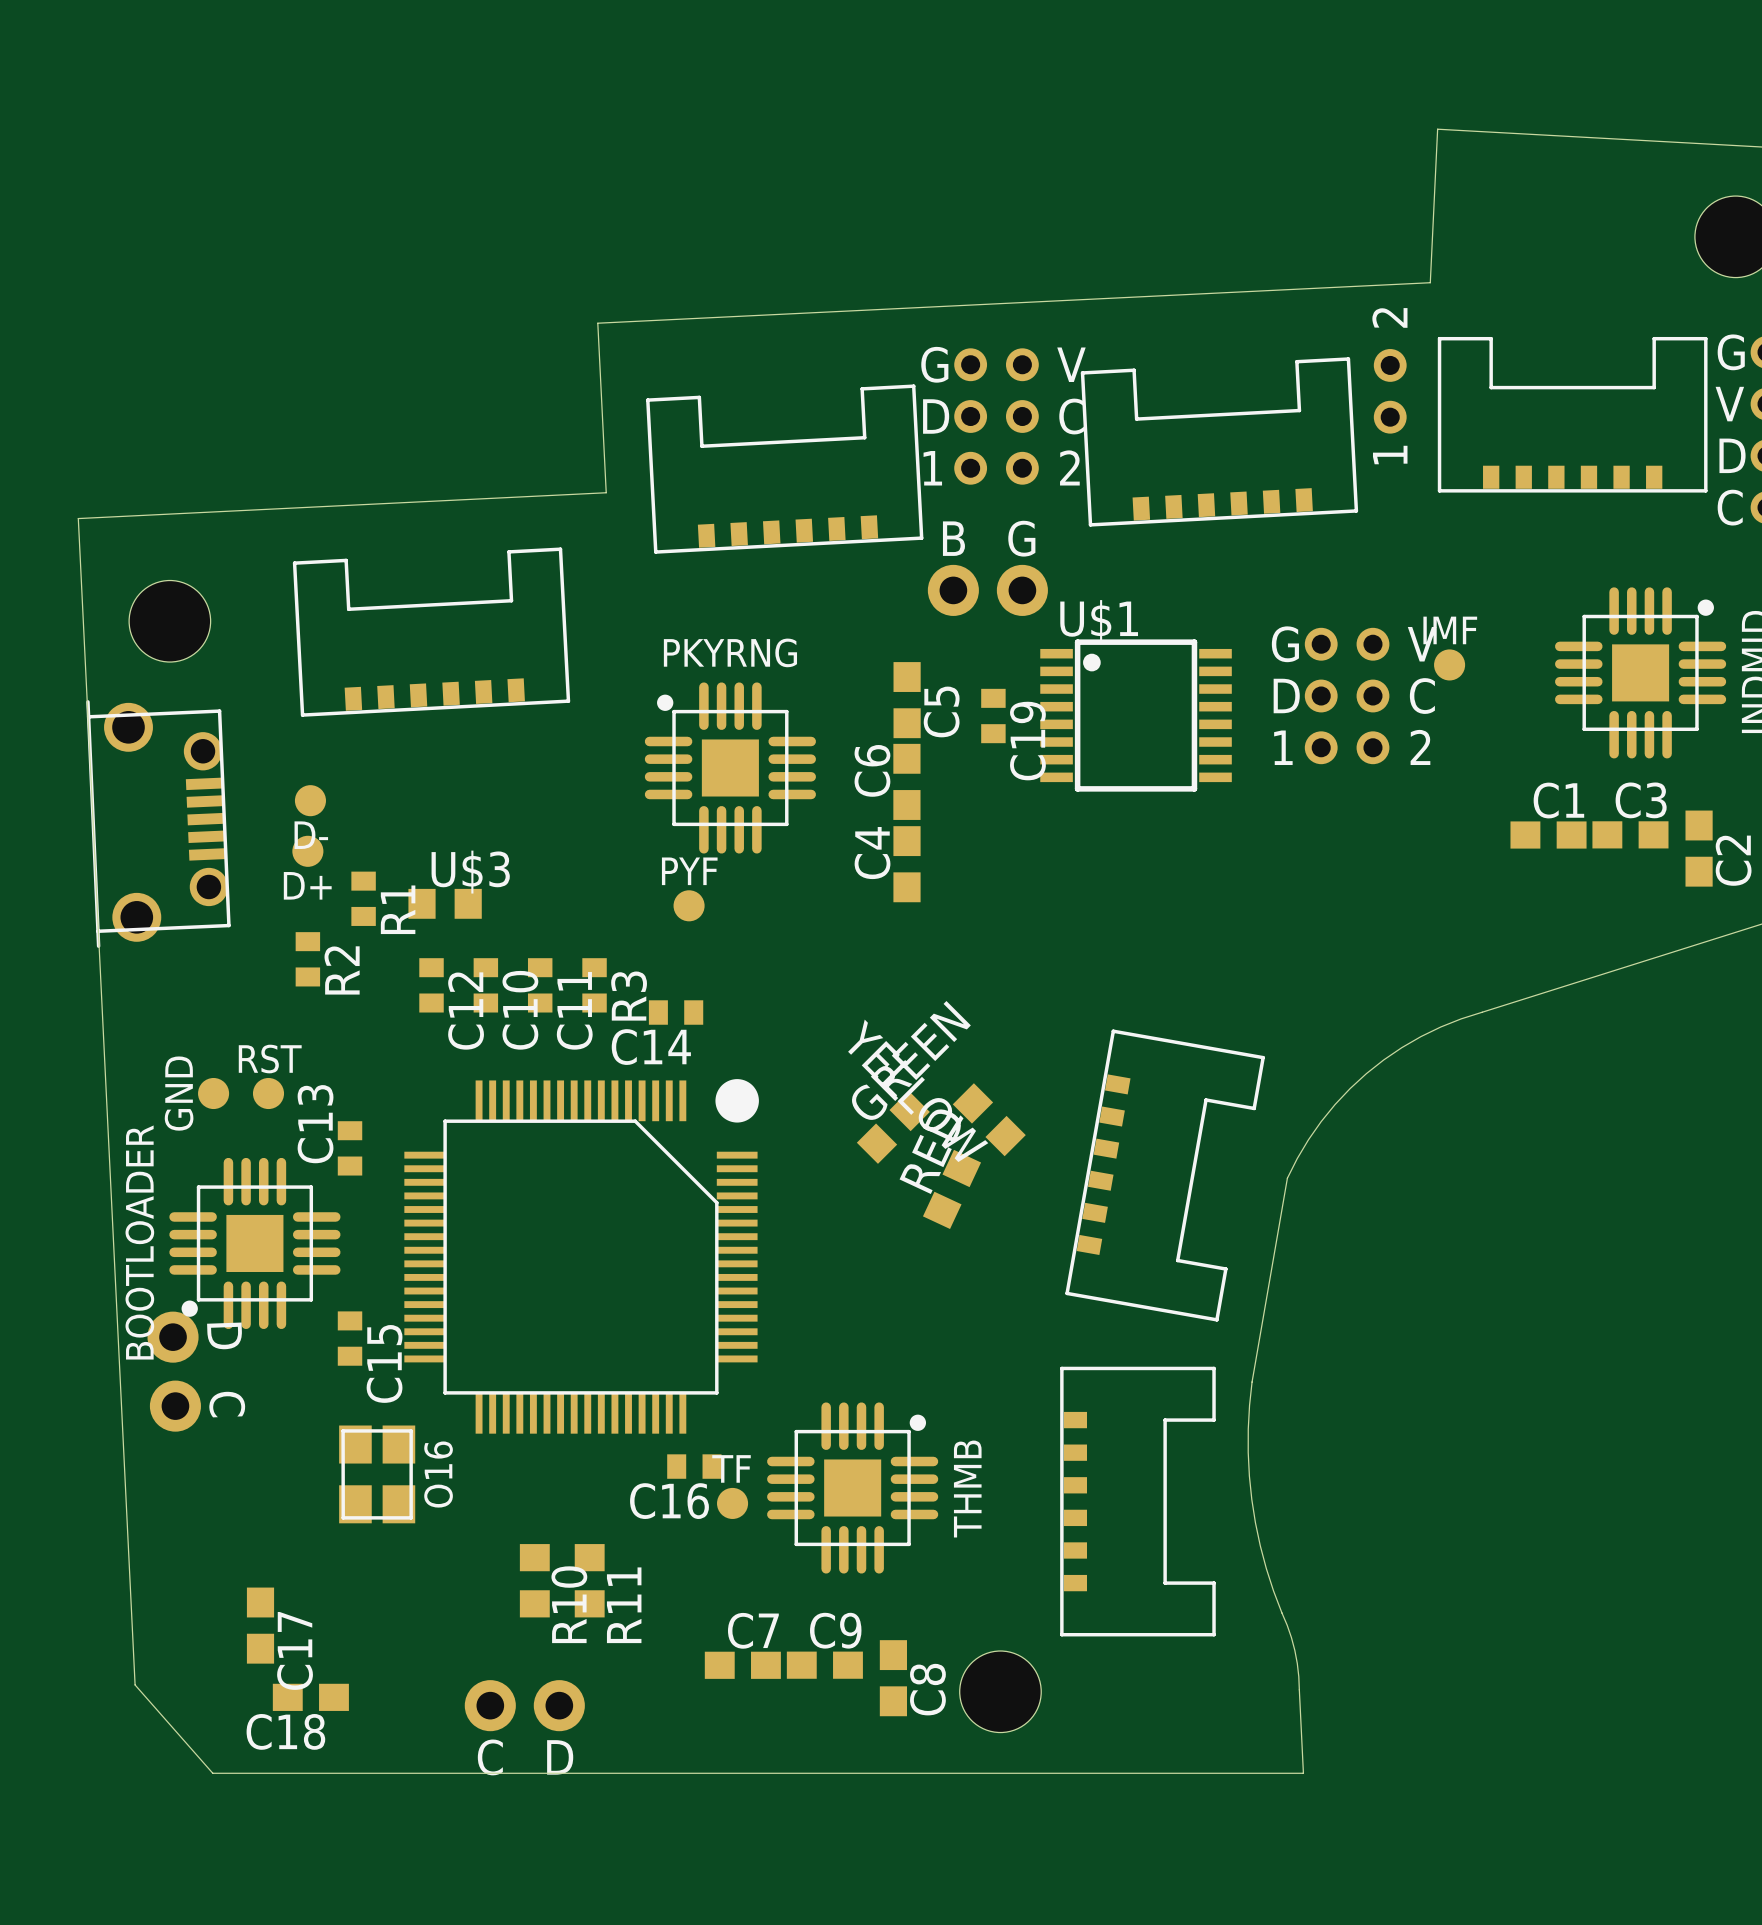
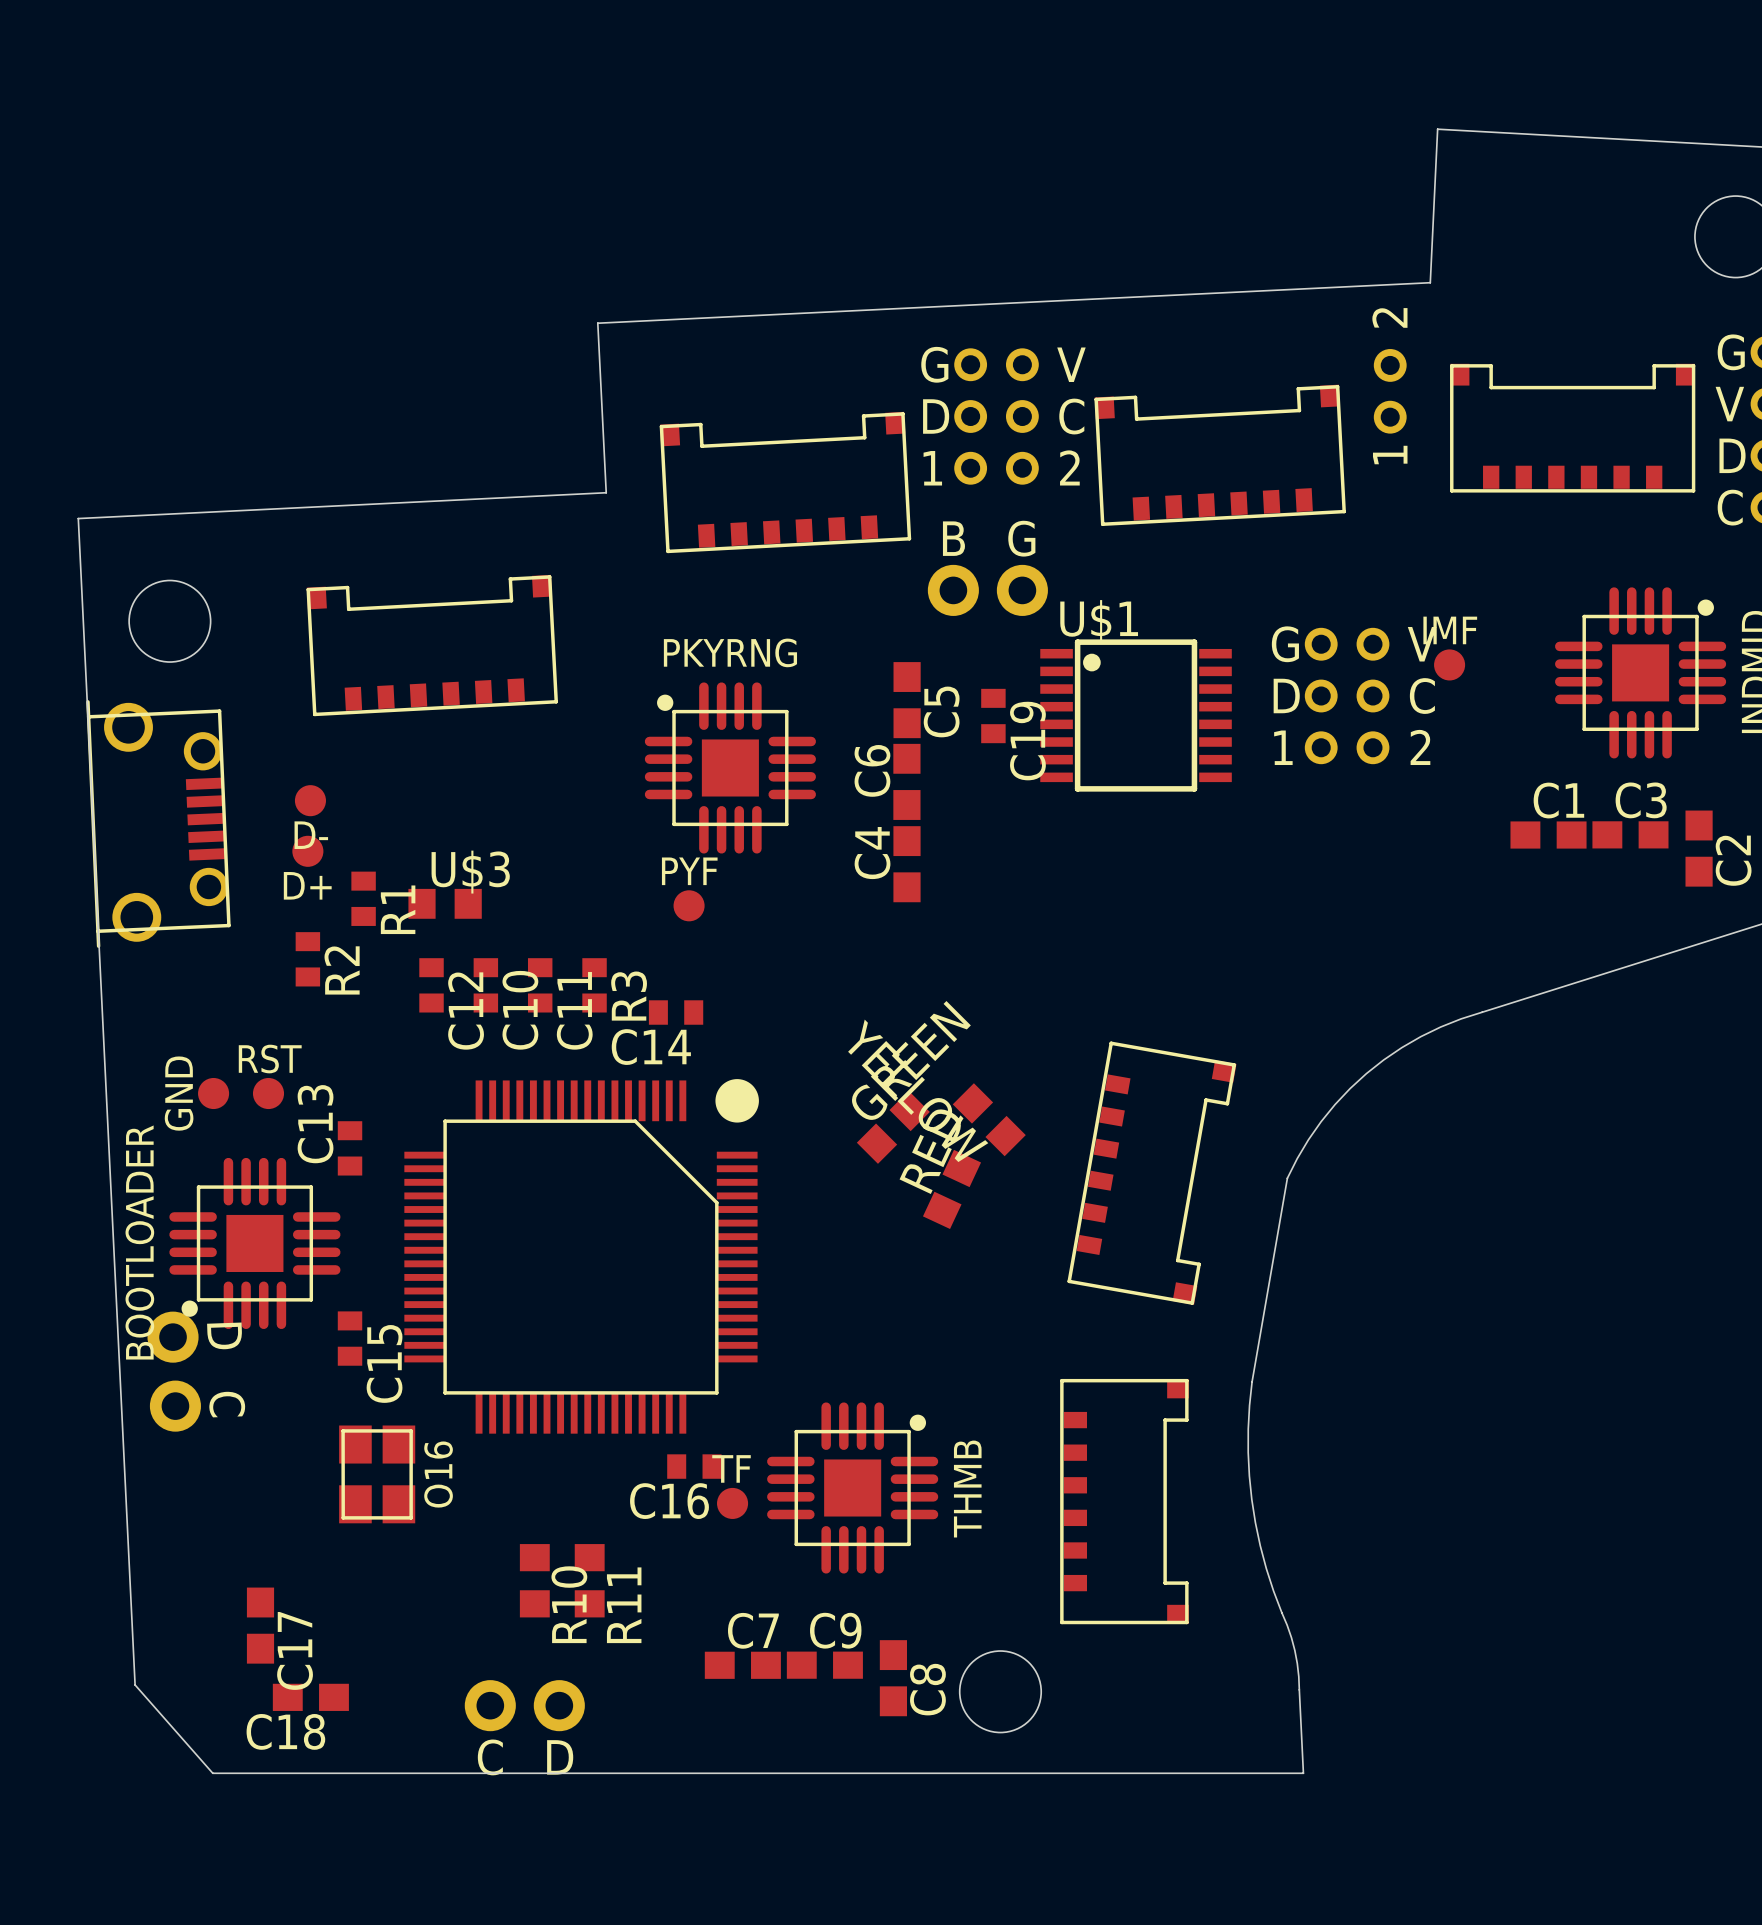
part footprint: [1437, 336, 1708, 493] -> [1450, 363, 1696, 493]
part footprint: [1080, 357, 1359, 527] -> [1094, 384, 1346, 526]
part footprint: [646, 384, 924, 554] -> [659, 411, 912, 554]
part footprint: [292, 547, 571, 717] -> [306, 574, 558, 717]
part footprint: [1065, 1029, 1265, 1322] -> [1067, 1041, 1237, 1305]
part footprint: [1060, 1366, 1216, 1637] -> [1060, 1378, 1189, 1625]

